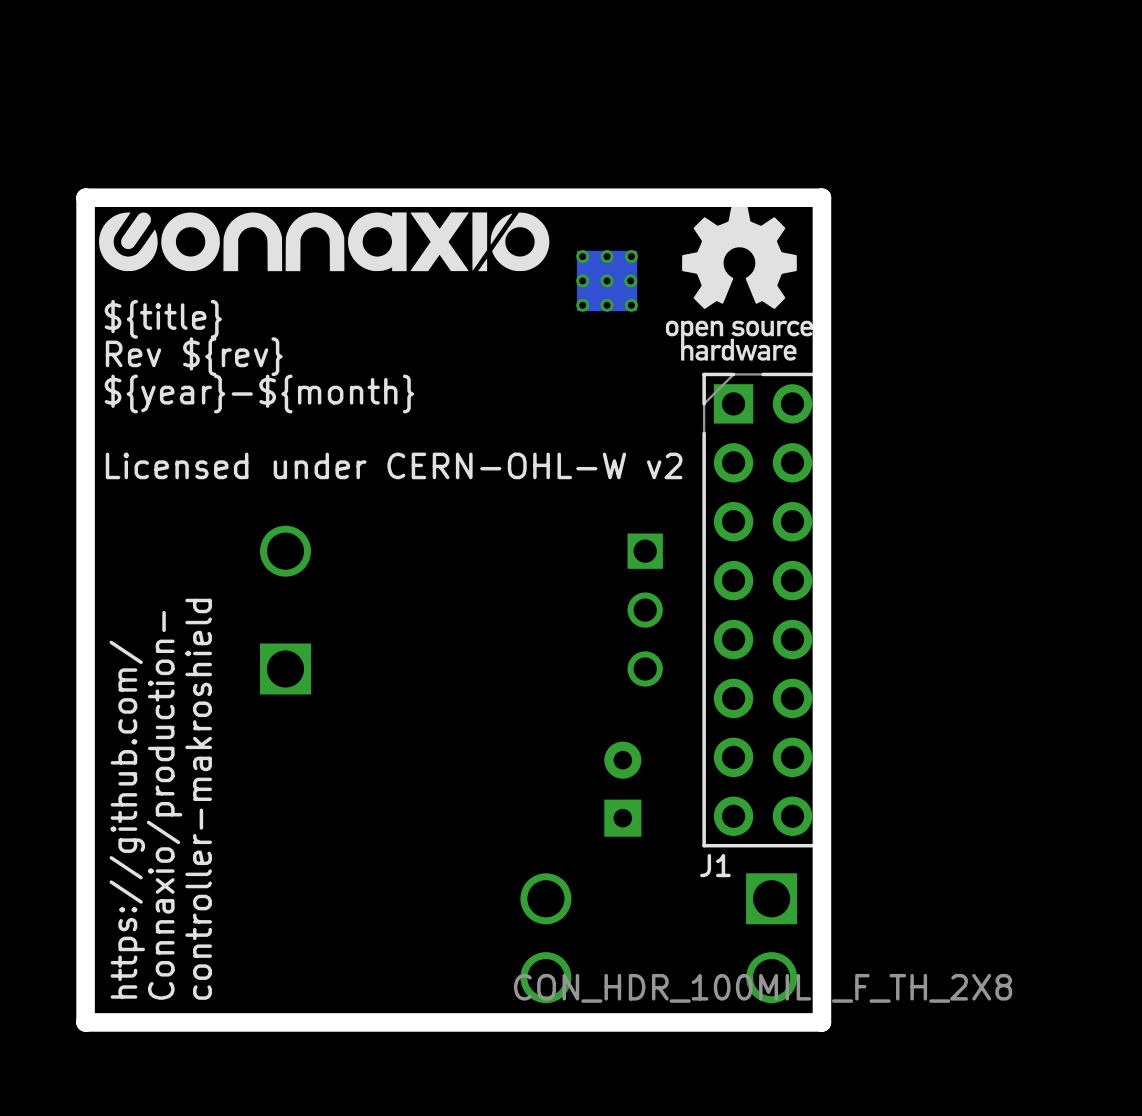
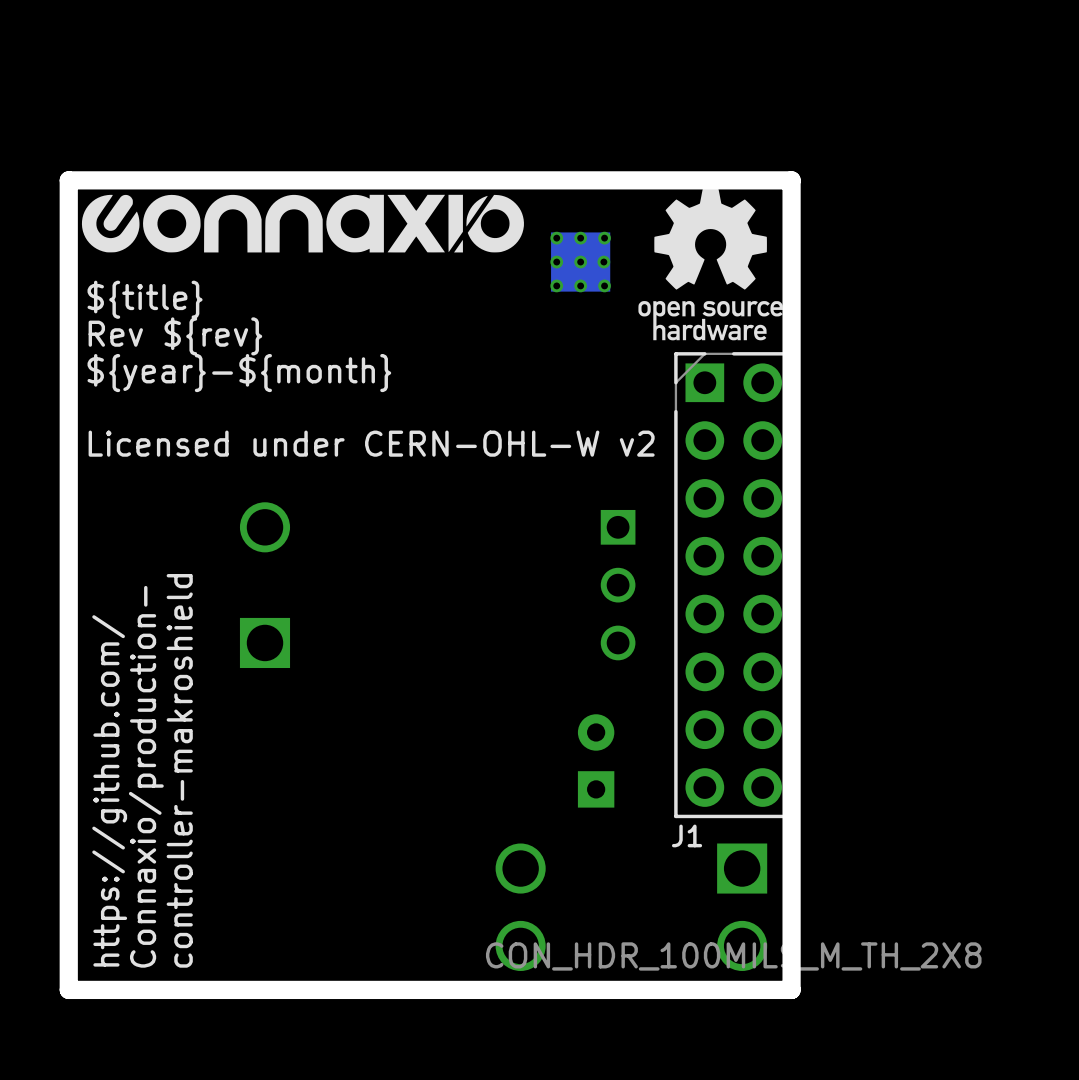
J1 value: CON_HDR_100MILS_F_TH_2X8 (763, 988) -> CON_HDR_100MILS_M_TH_2X8 (733, 956)

